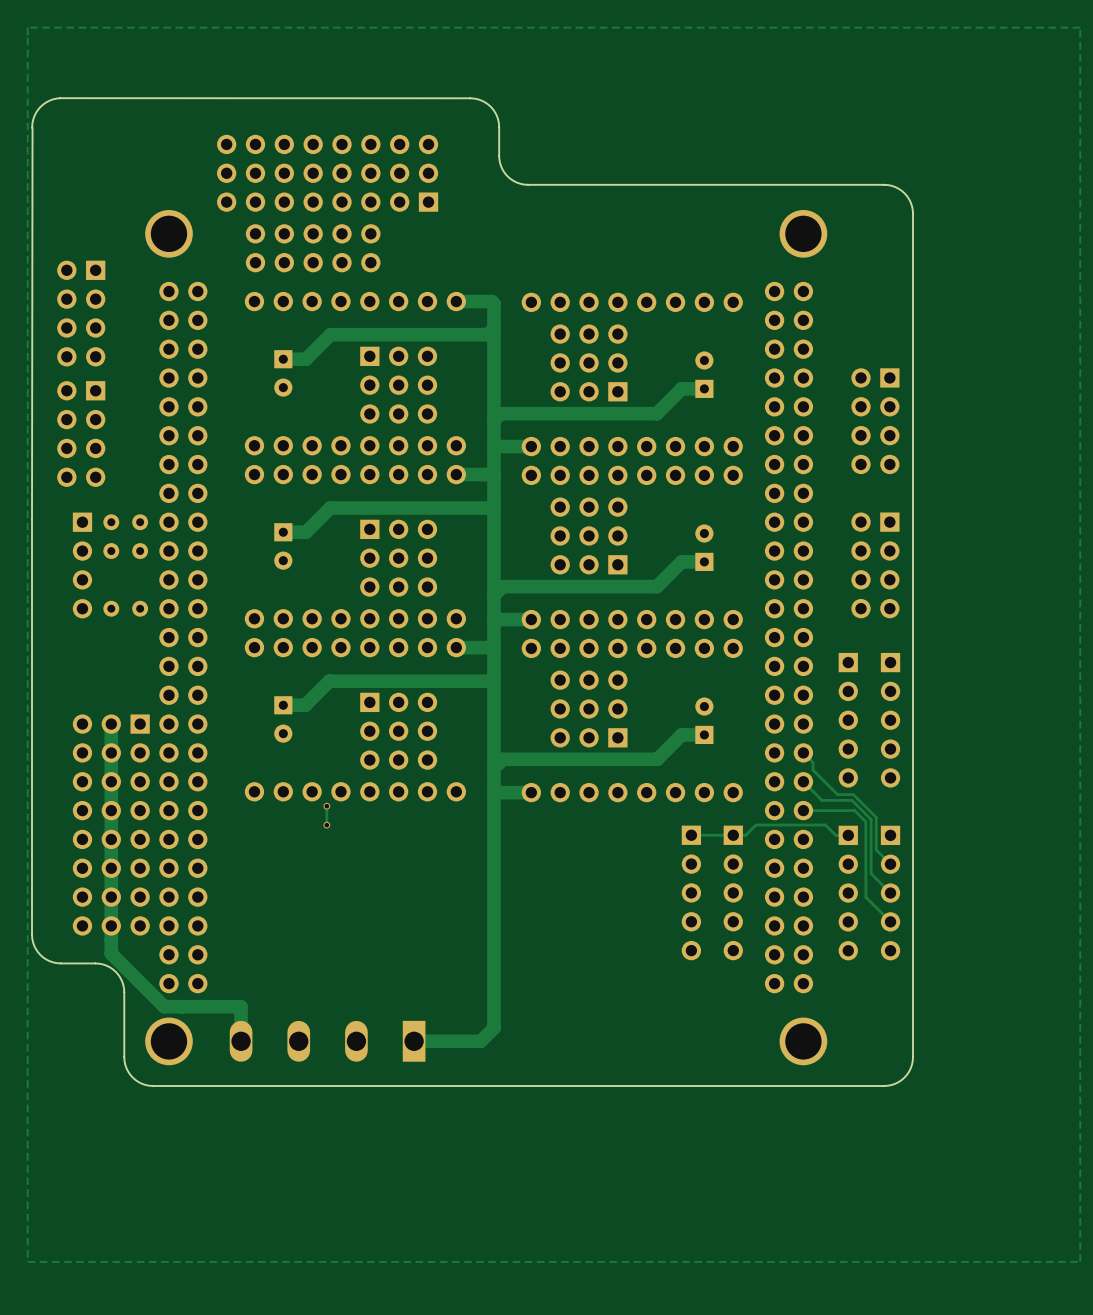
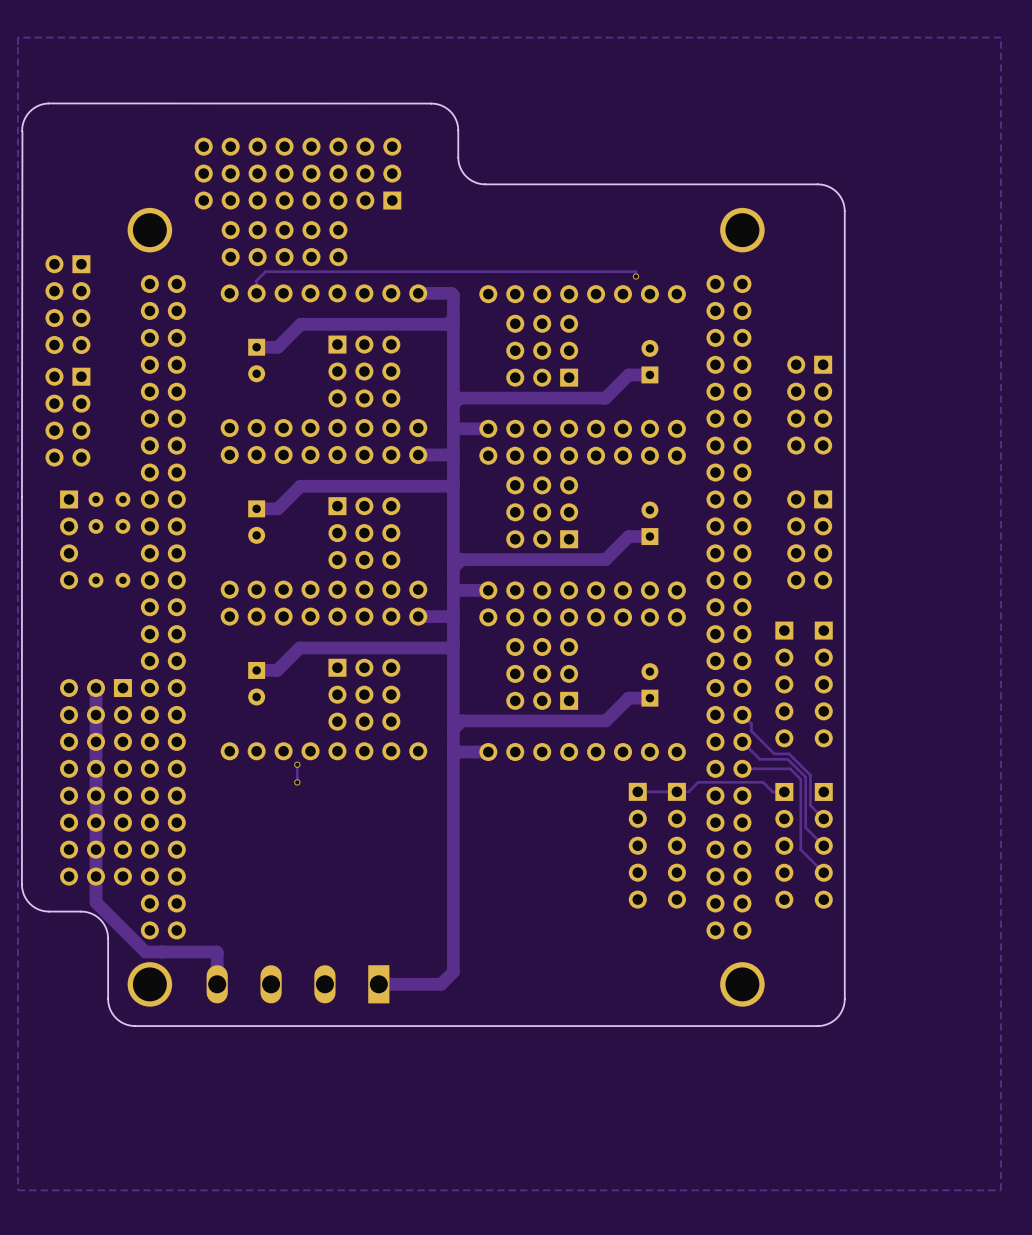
track: none -> (635, 276) (635, 271) (265, 271) (256, 280) (256, 293)
via: none -> (635, 276)

